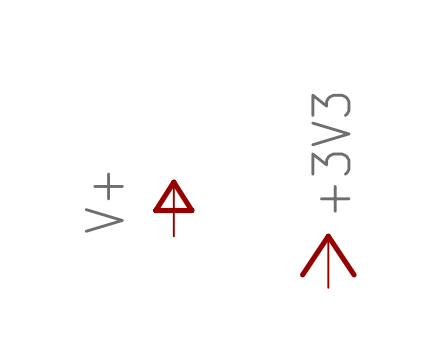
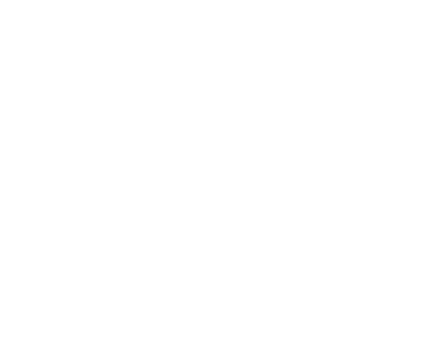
power symbol: V+ (173, 207) -> none
power symbol: +3V3 (328, 260) -> none

